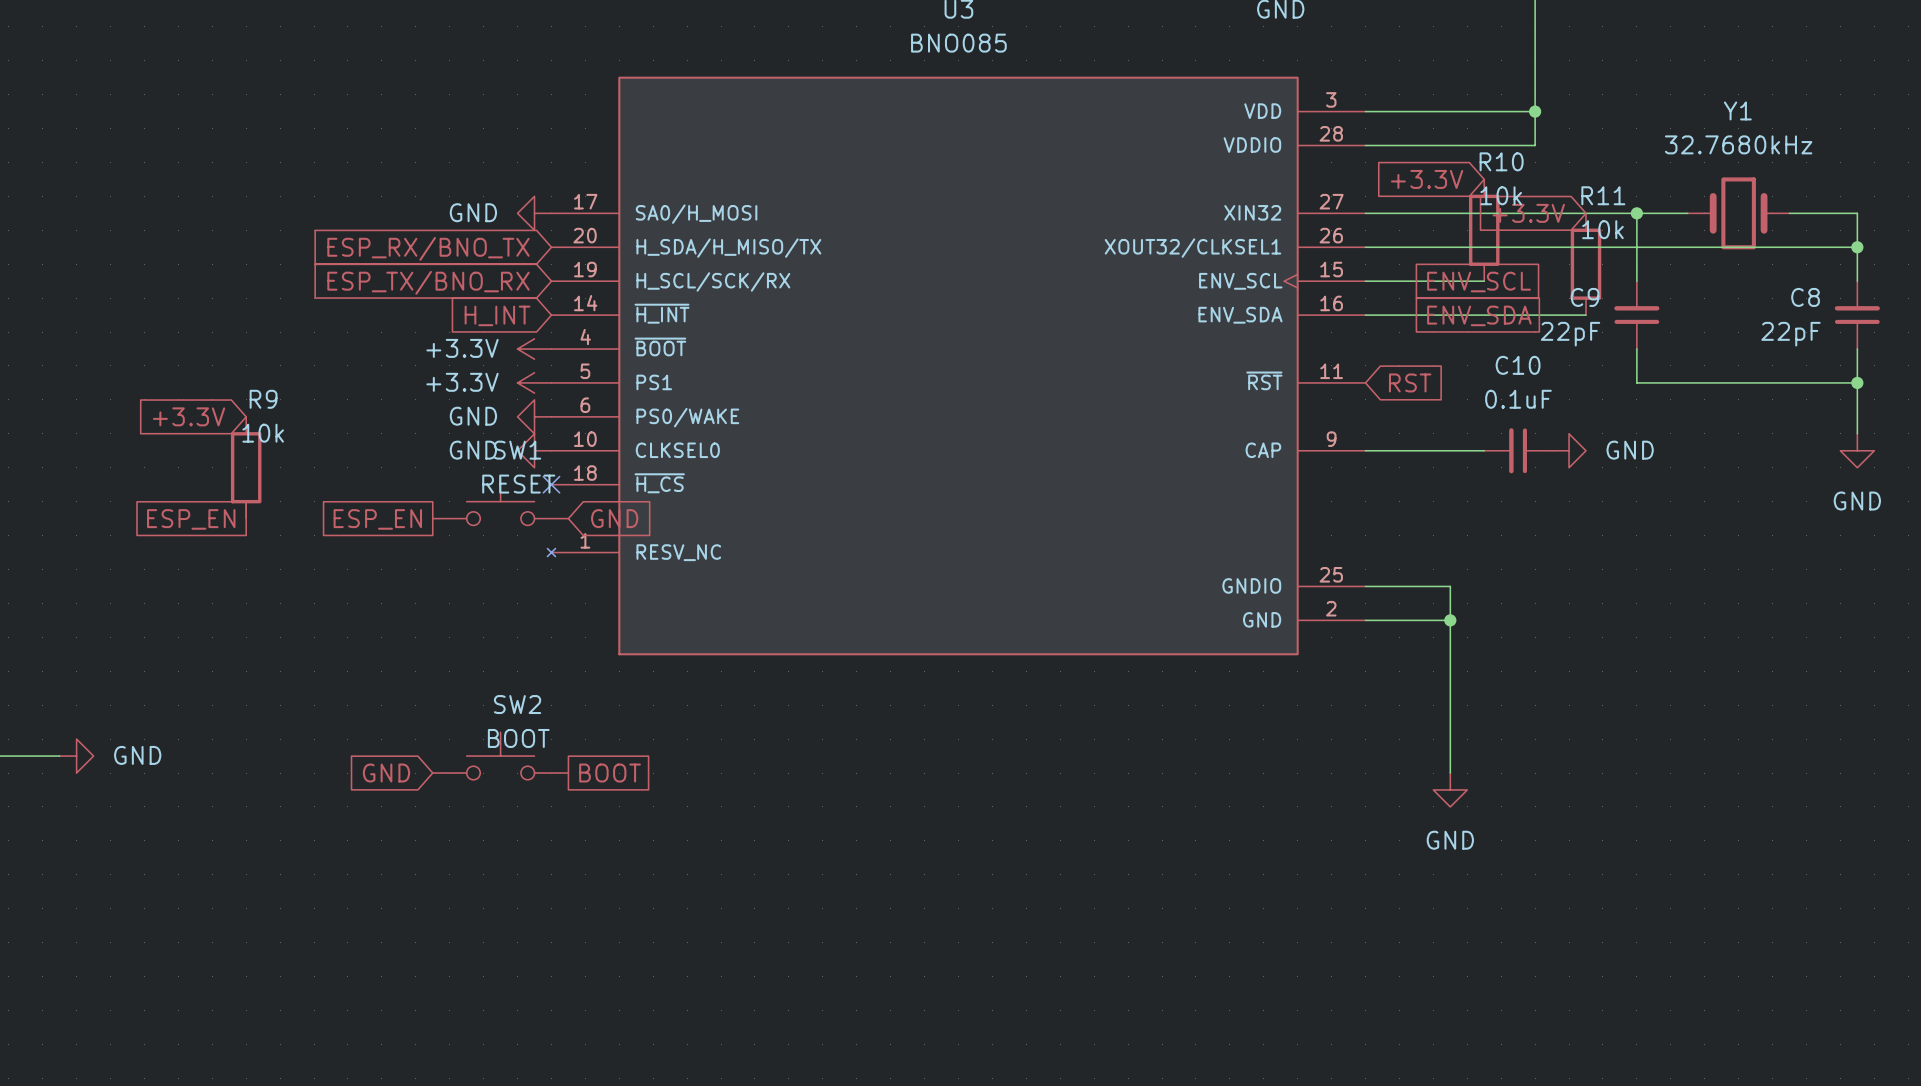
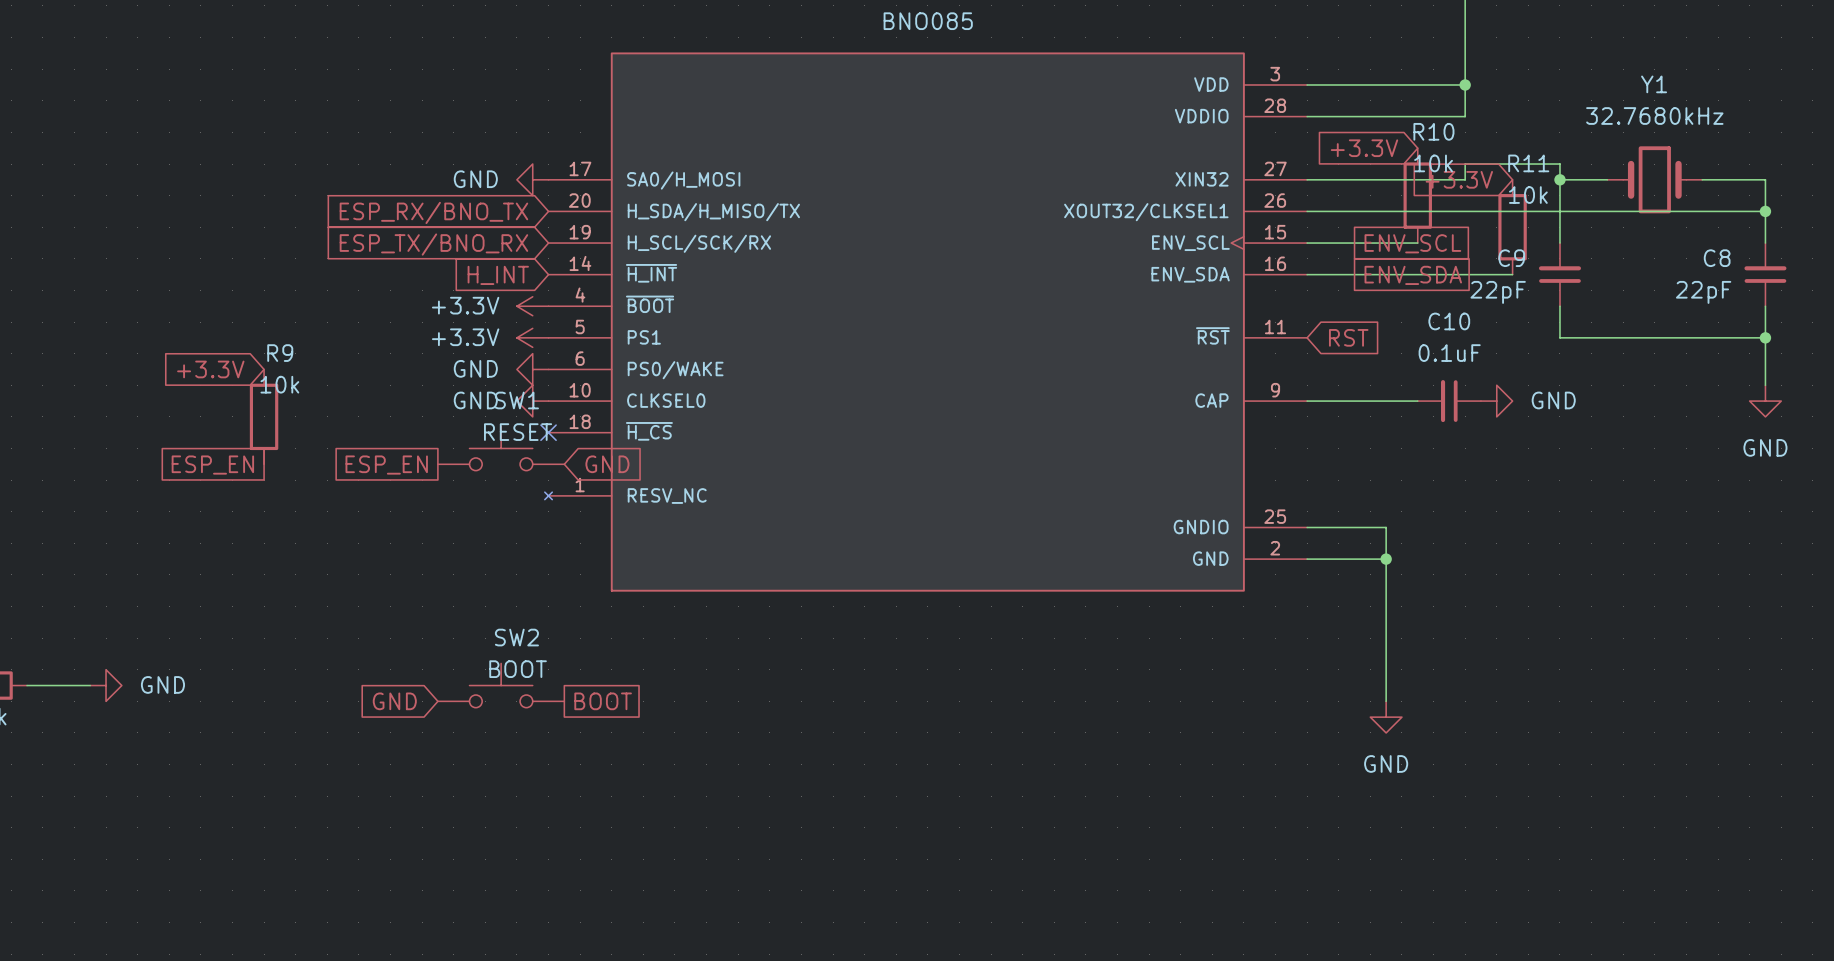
wire: (1535, 213) (1636, 213) -> (1465, 179) (1465, 164) (1559, 164) (1559, 179)

